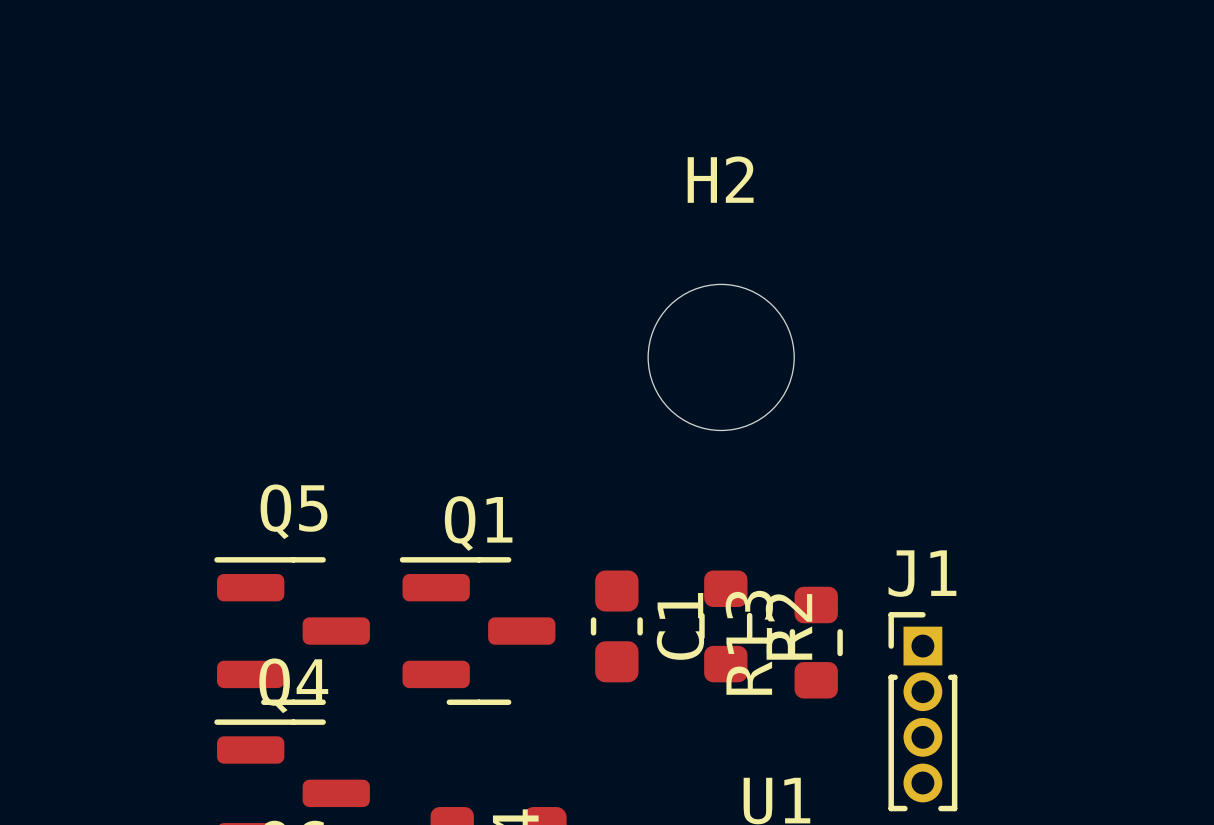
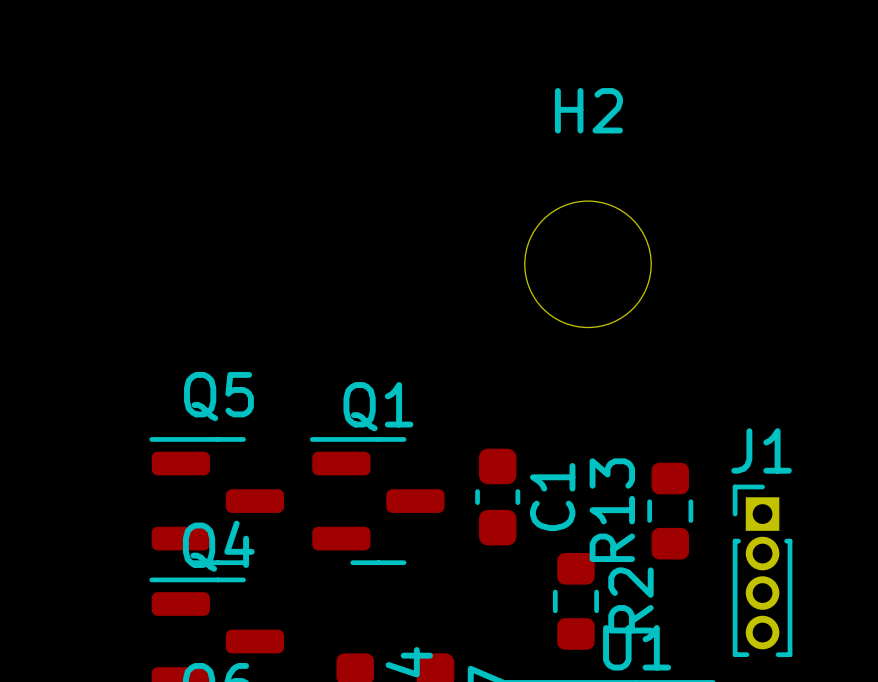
R2 position: (725, 626) -> (575, 601)

